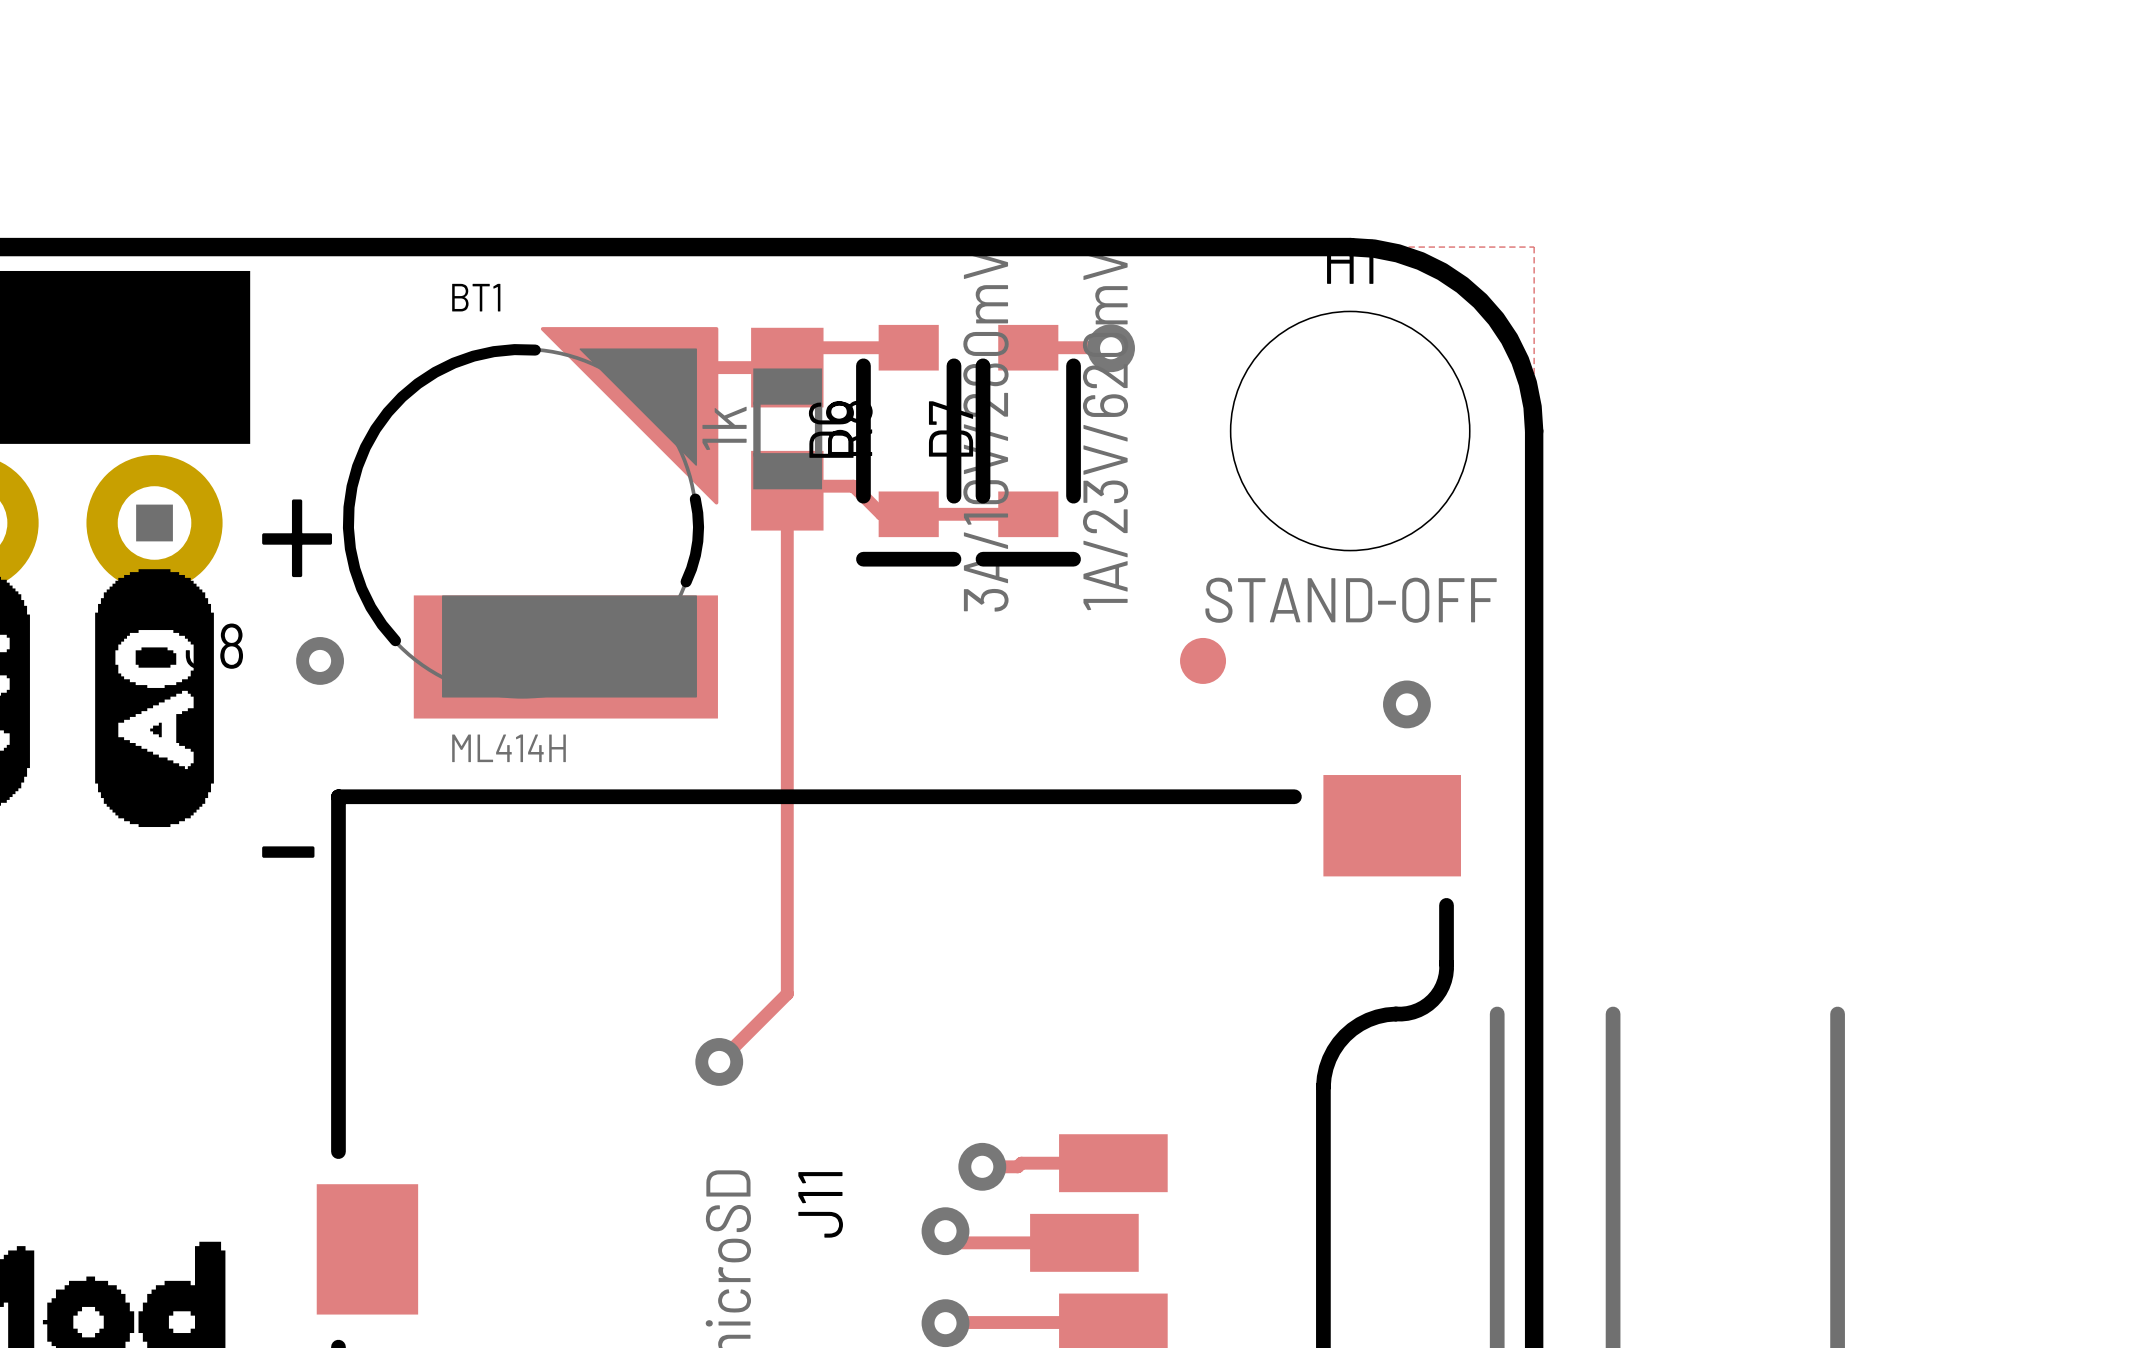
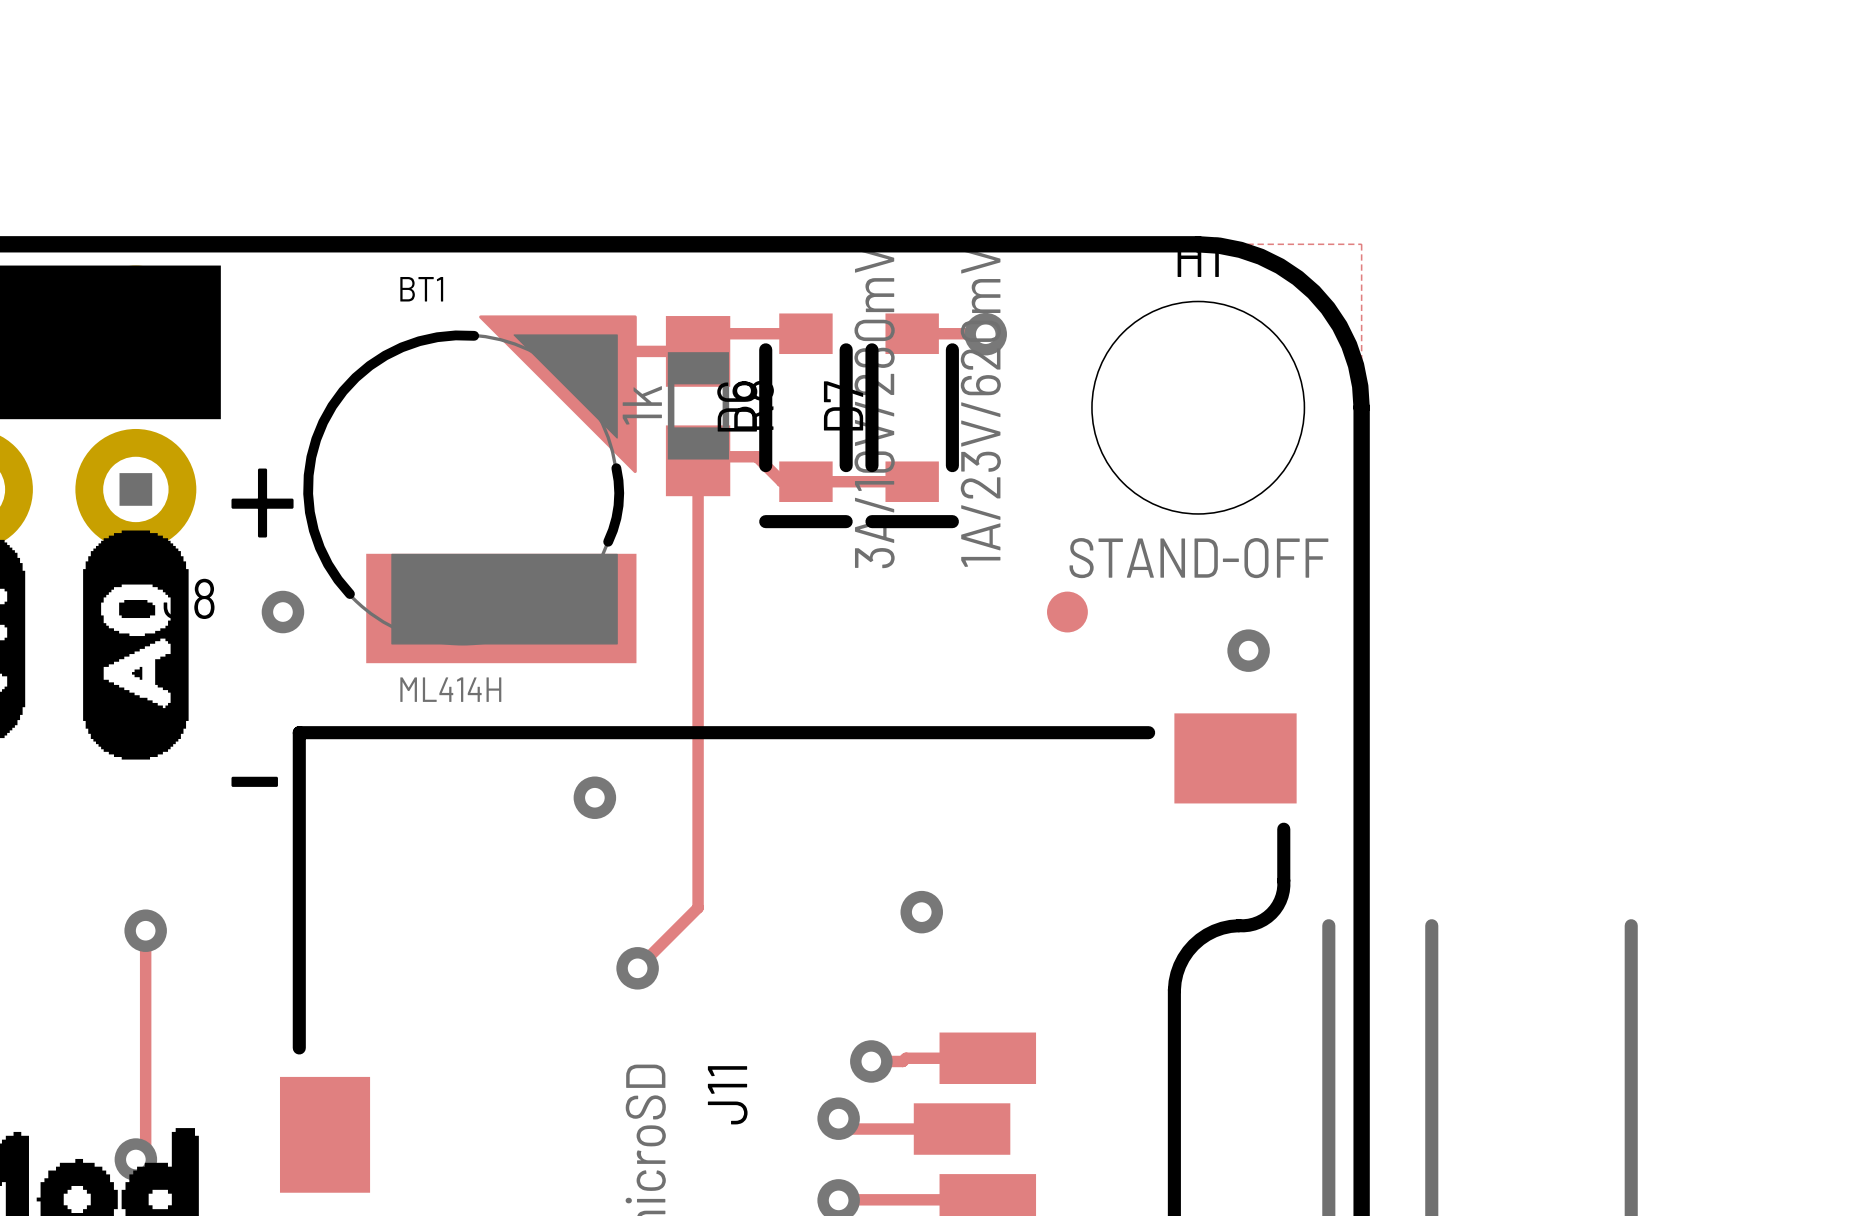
via: none -> (594, 797)
via: none -> (921, 912)
track: none -> (145, 930) (145, 1149) (135, 1159)
via: none -> (145, 930)
via: none -> (135, 1159)

